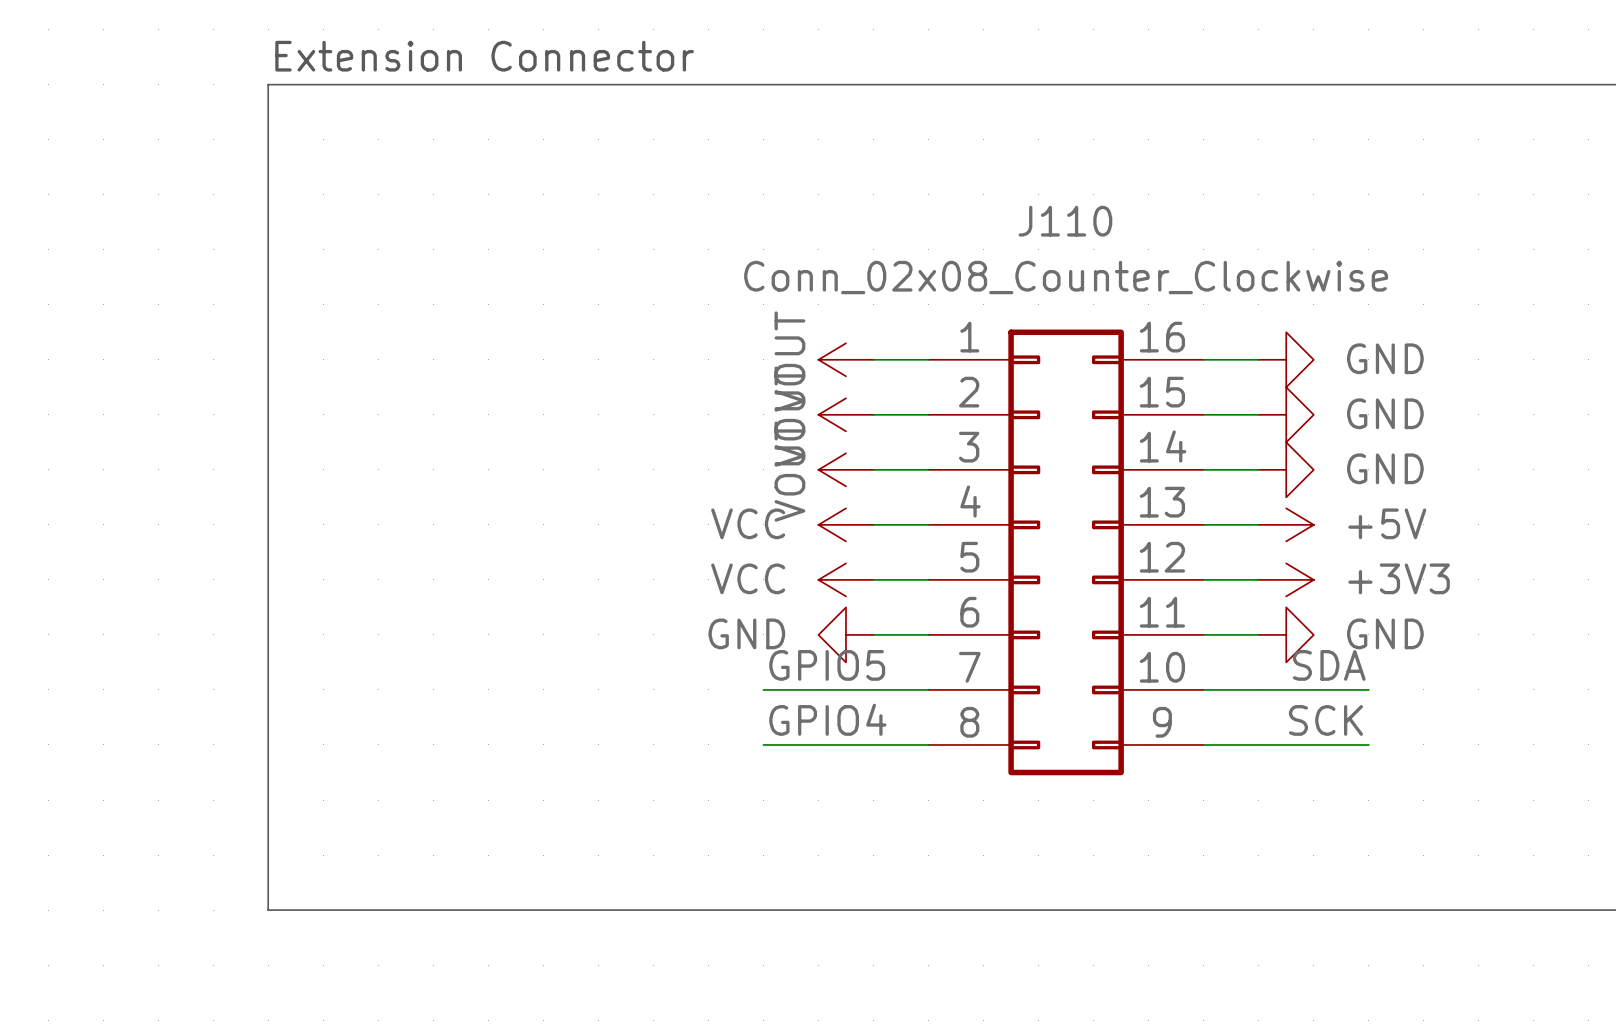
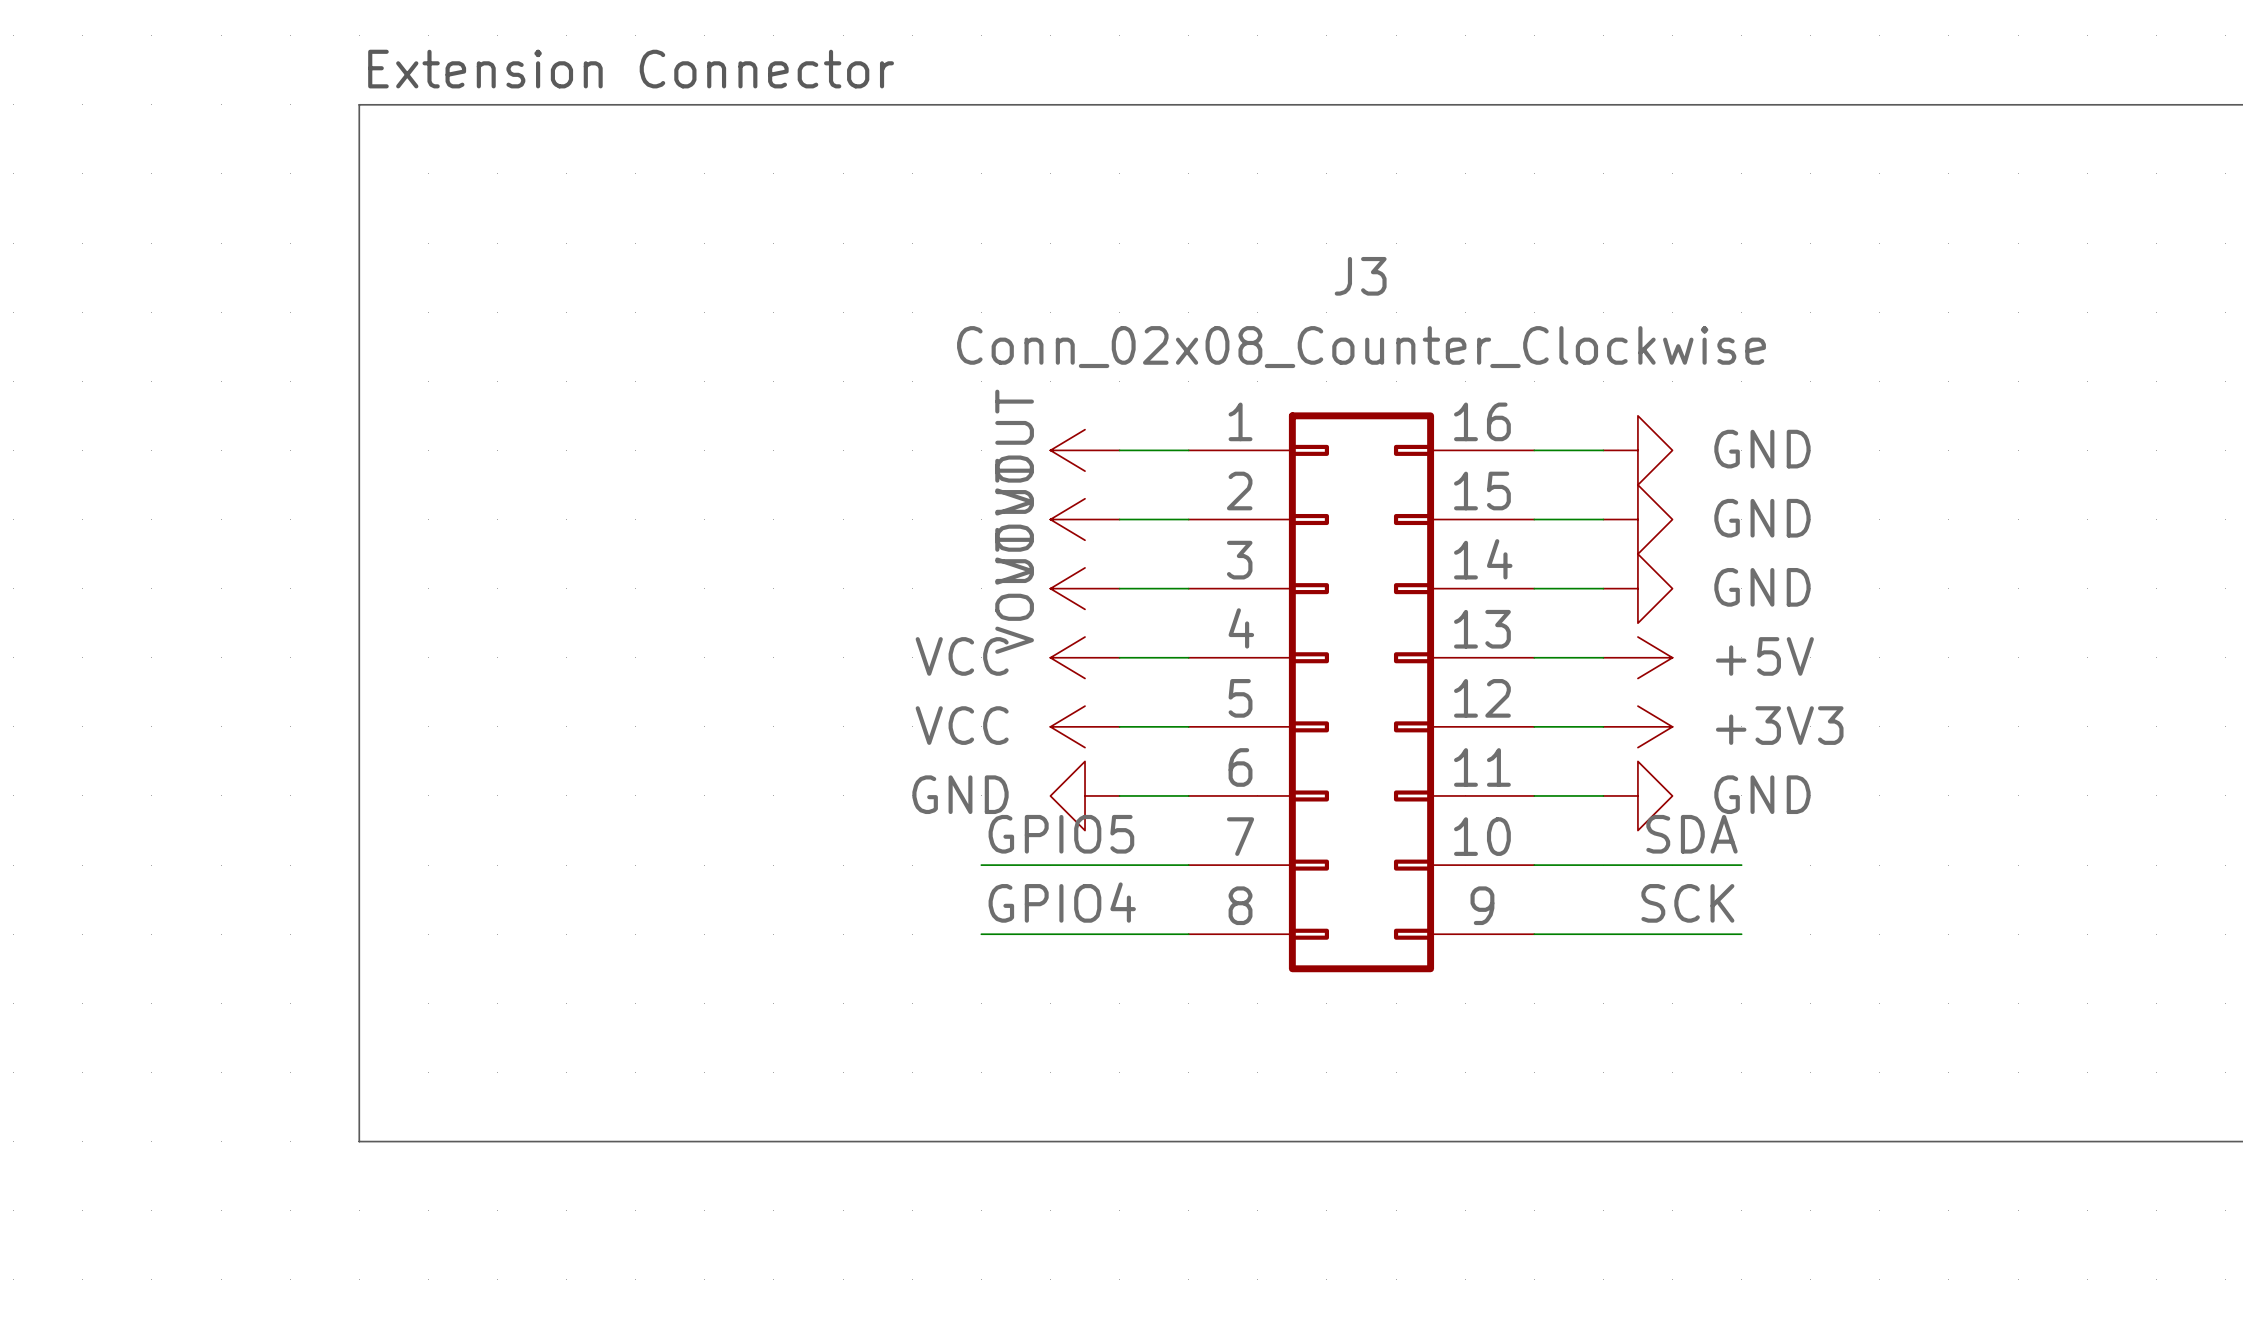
J110 name: J110 (1065, 221) -> J3 (1360, 276)

